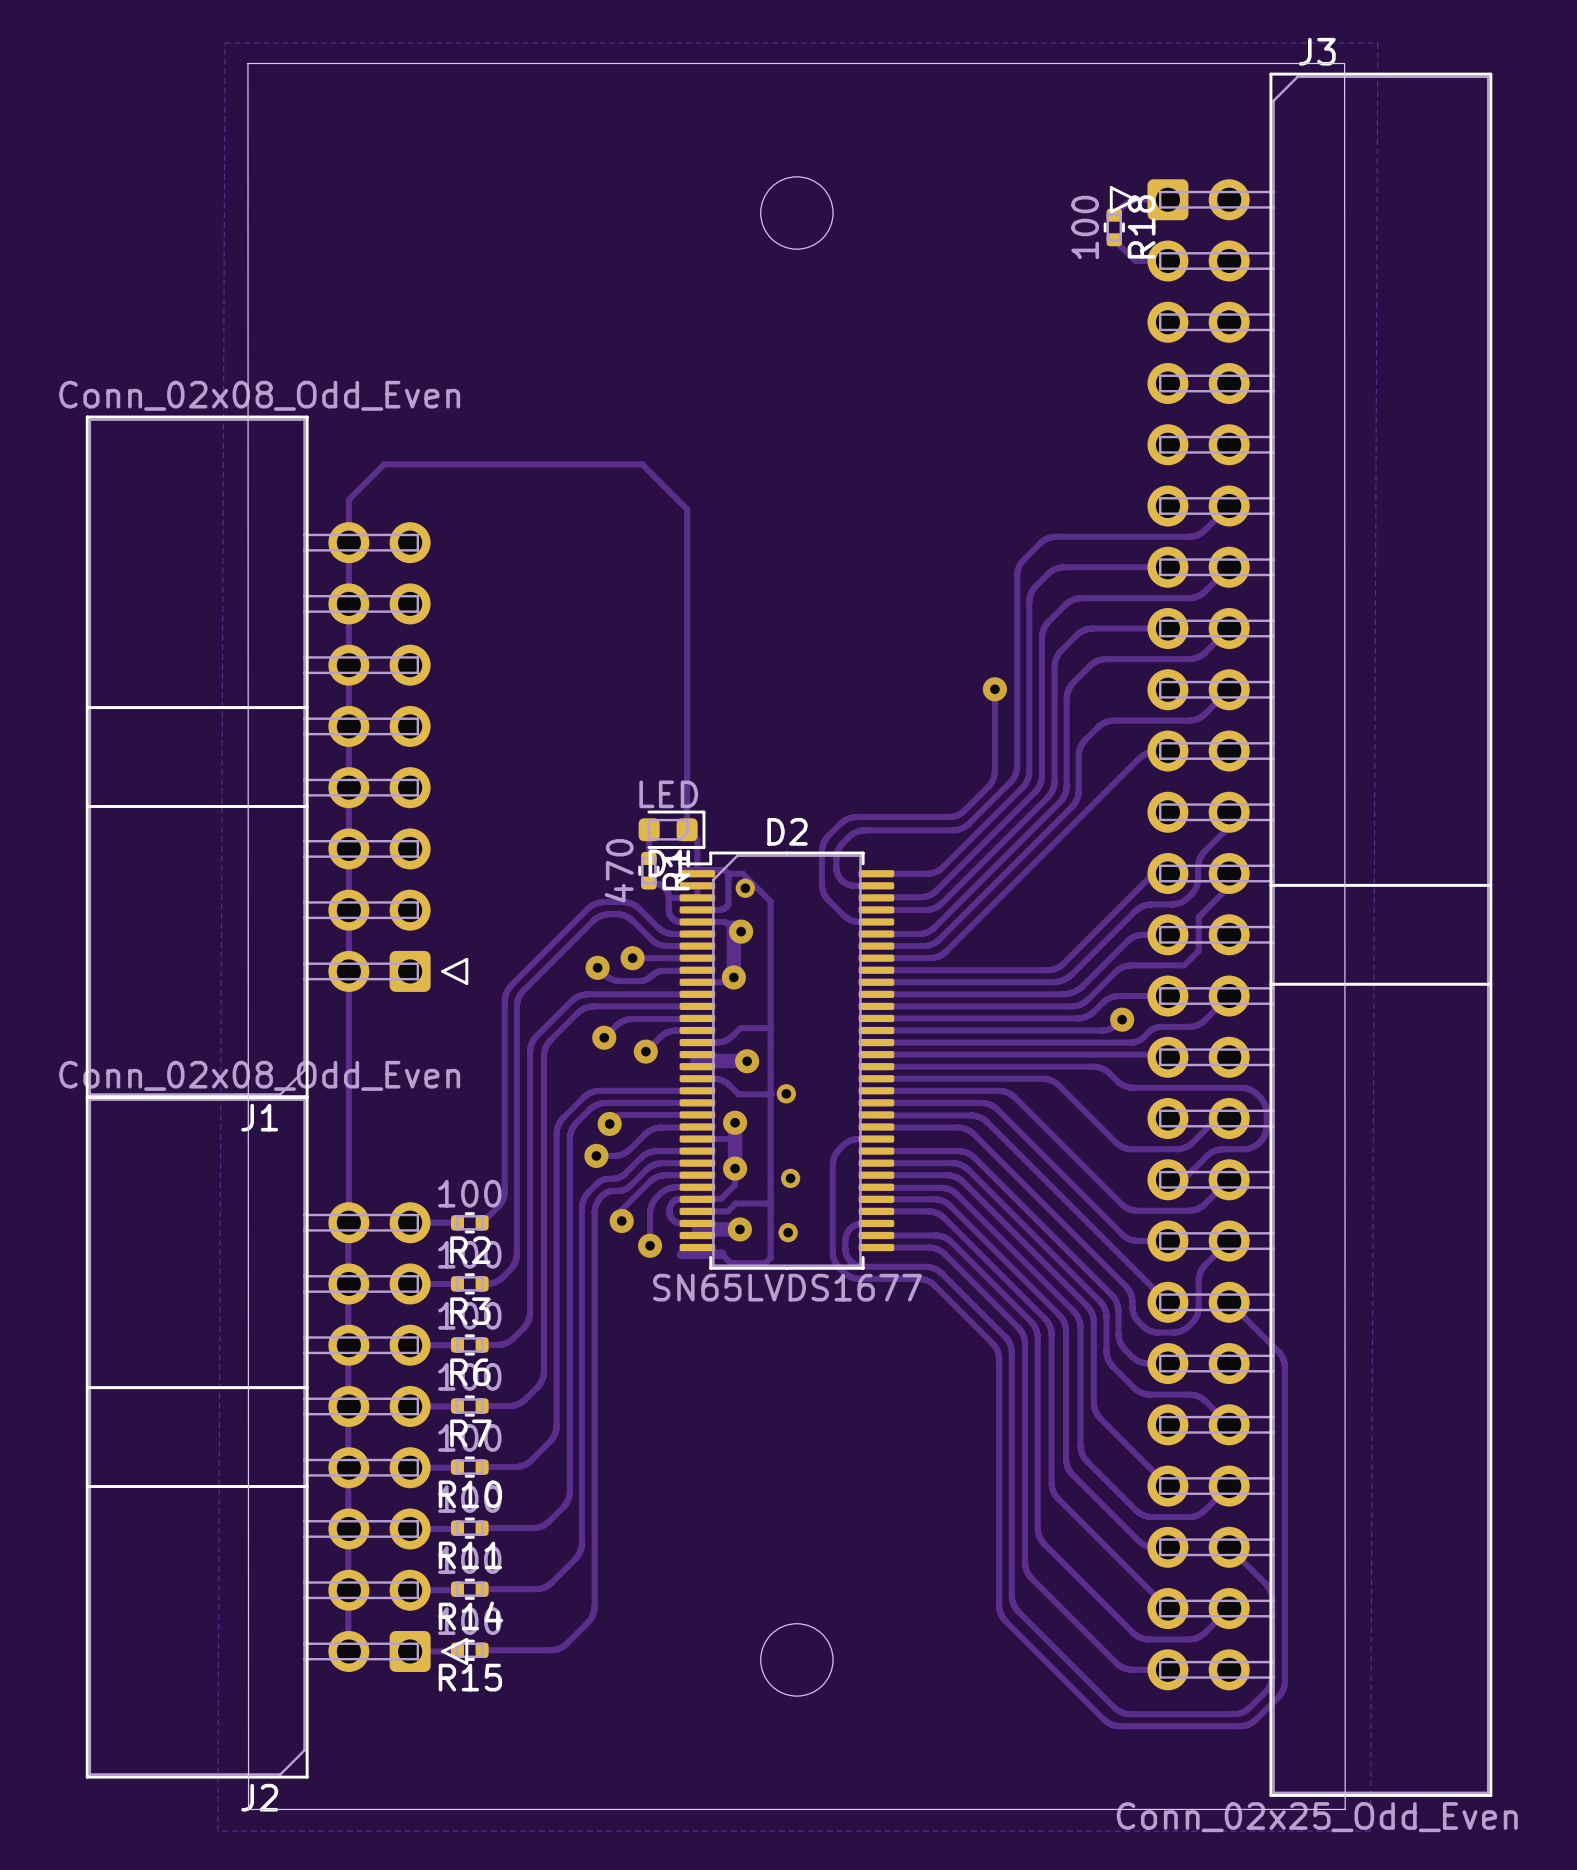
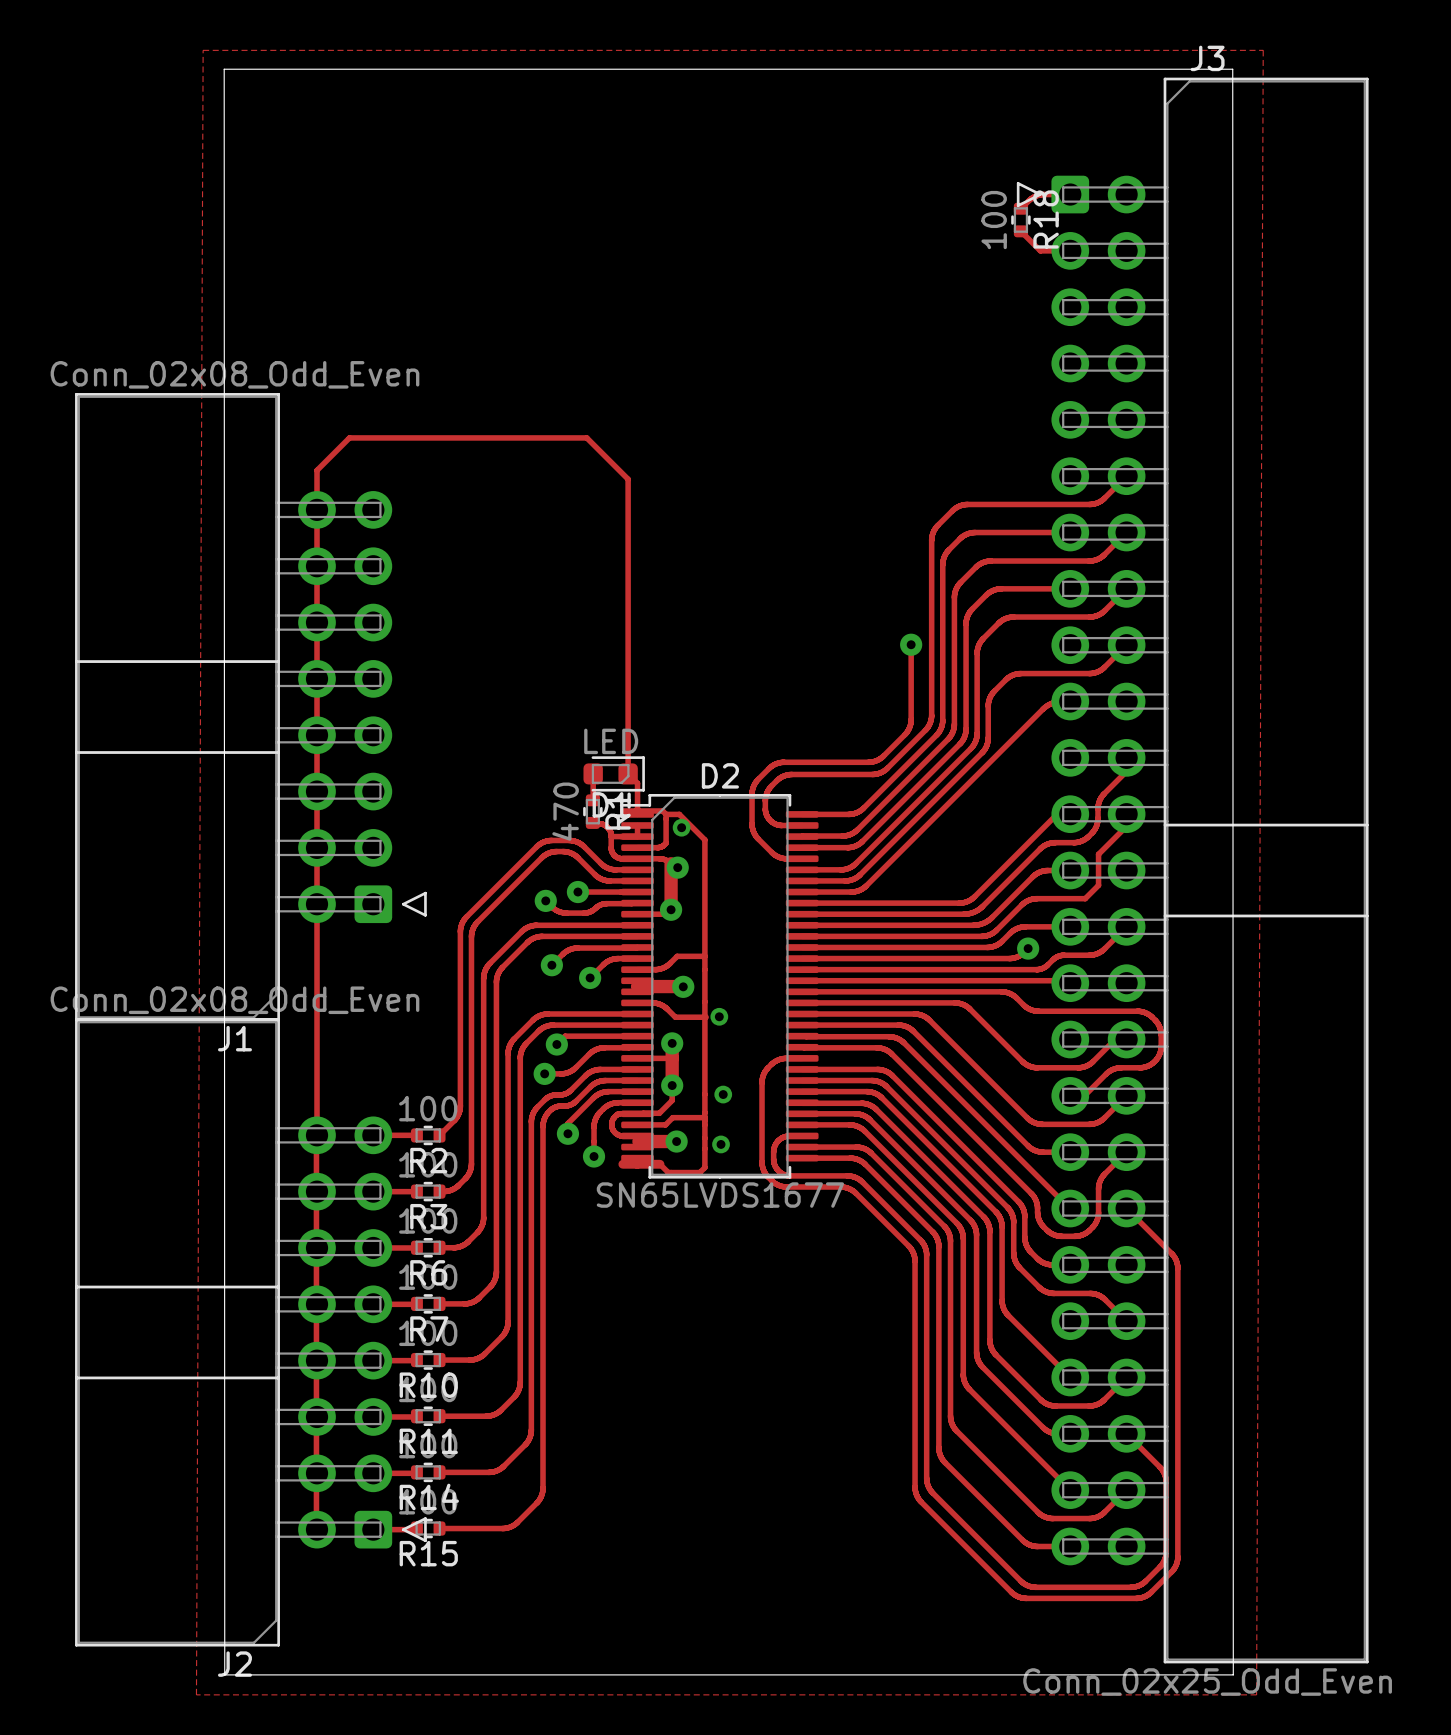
round board edge: [760, 176, 834, 250] -> none
round board edge: [760, 1623, 834, 1697] -> none

